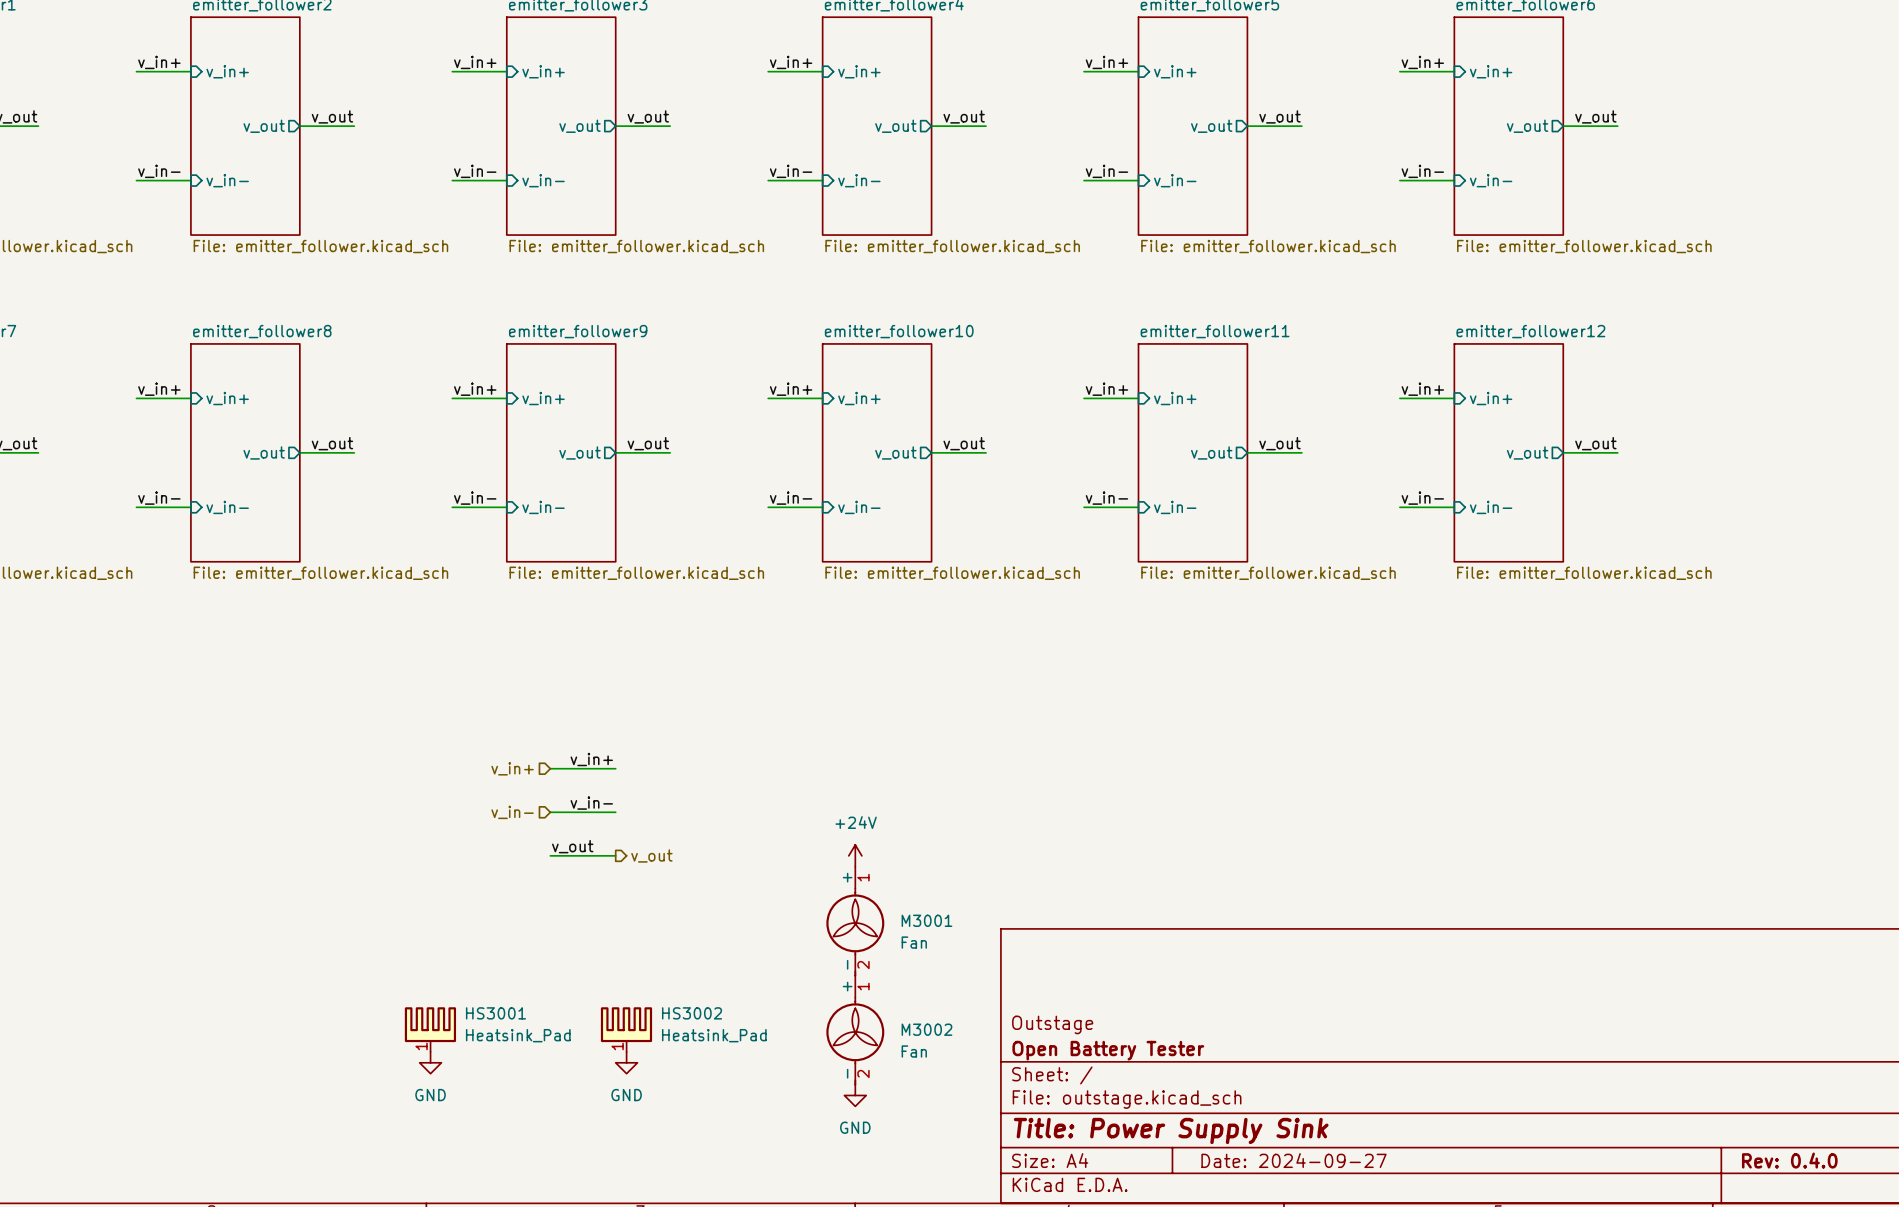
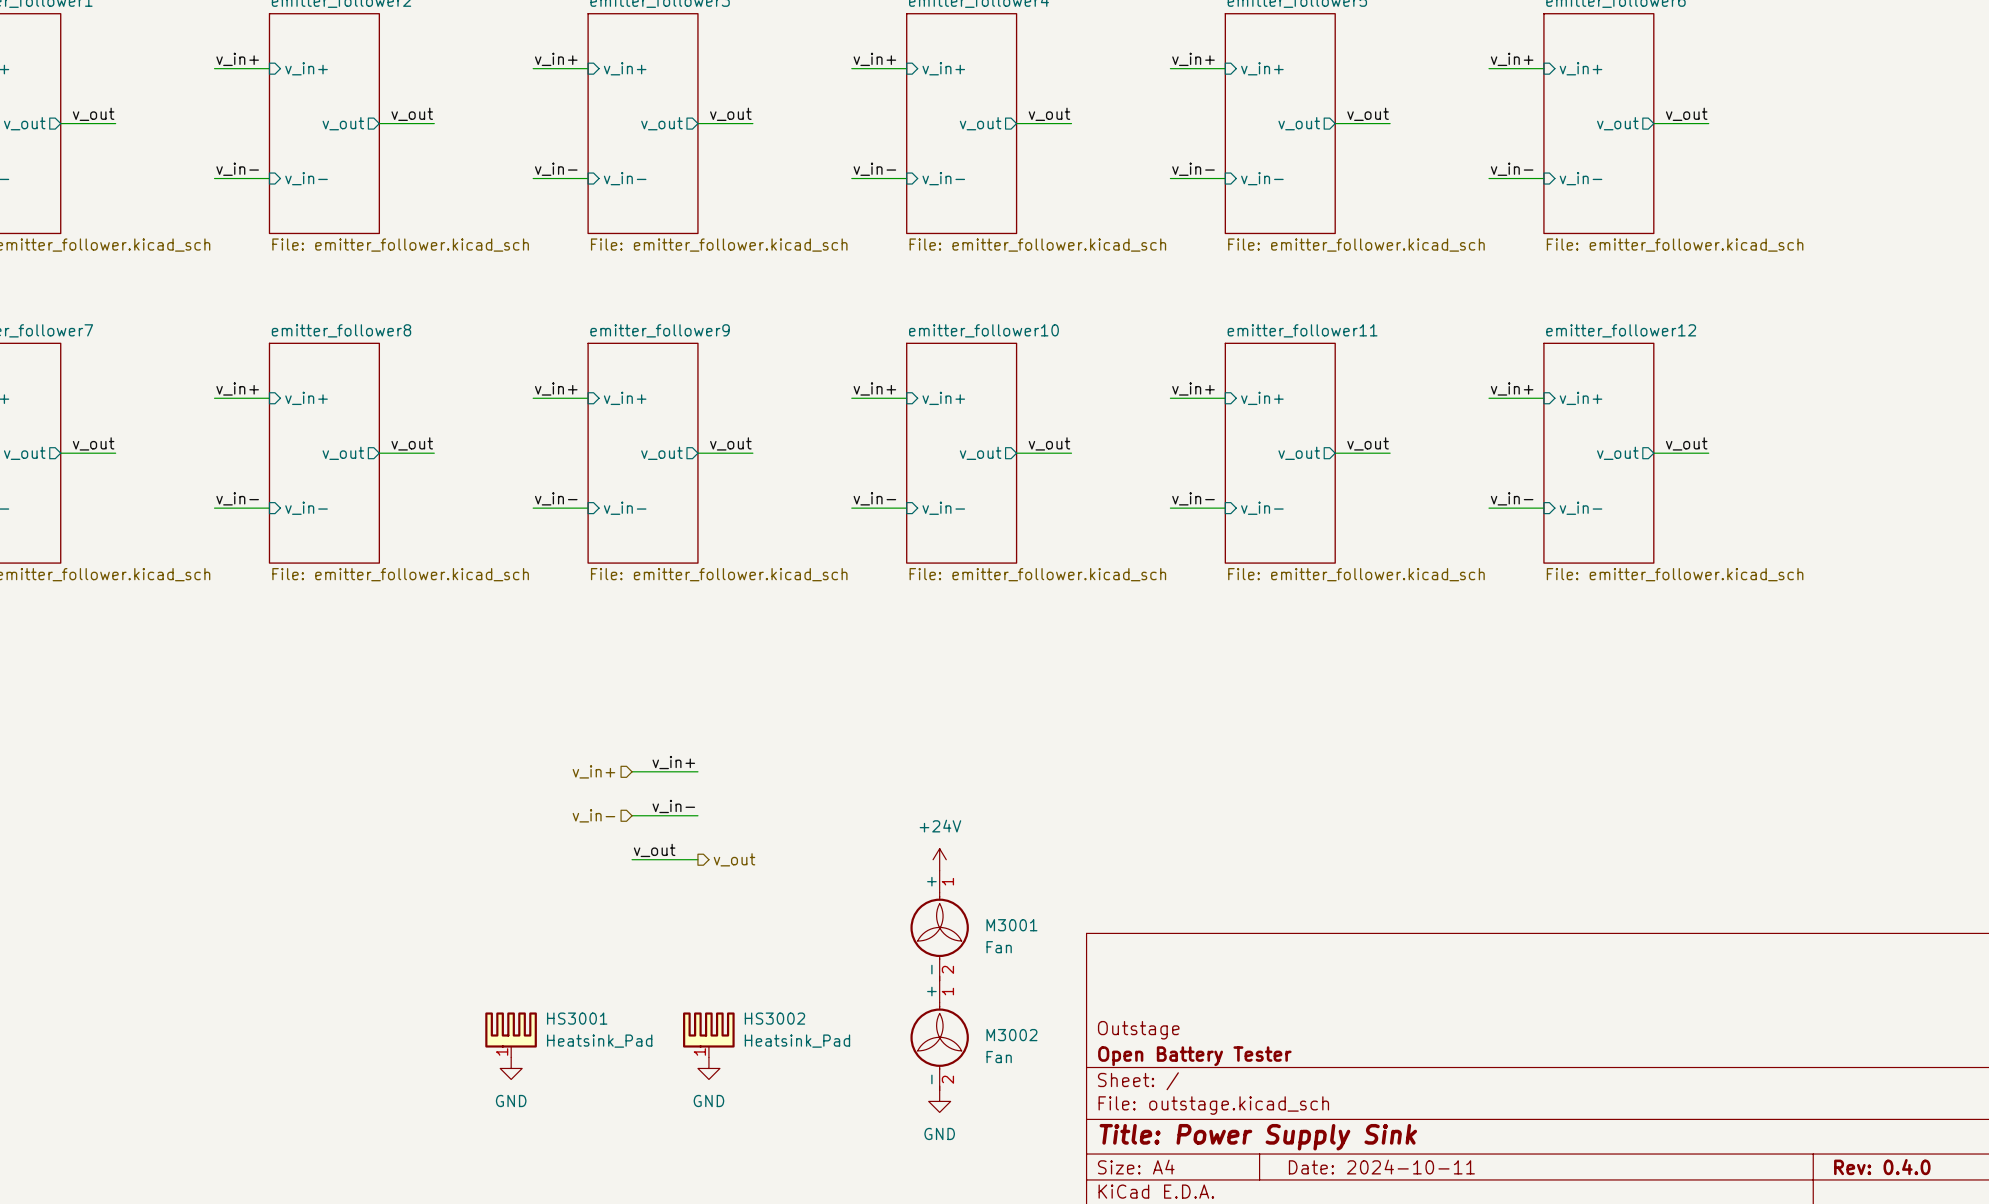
title block: Date: 2024-09-27 (1294, 1160) -> Date: 2024-10-11 (1381, 1167)

